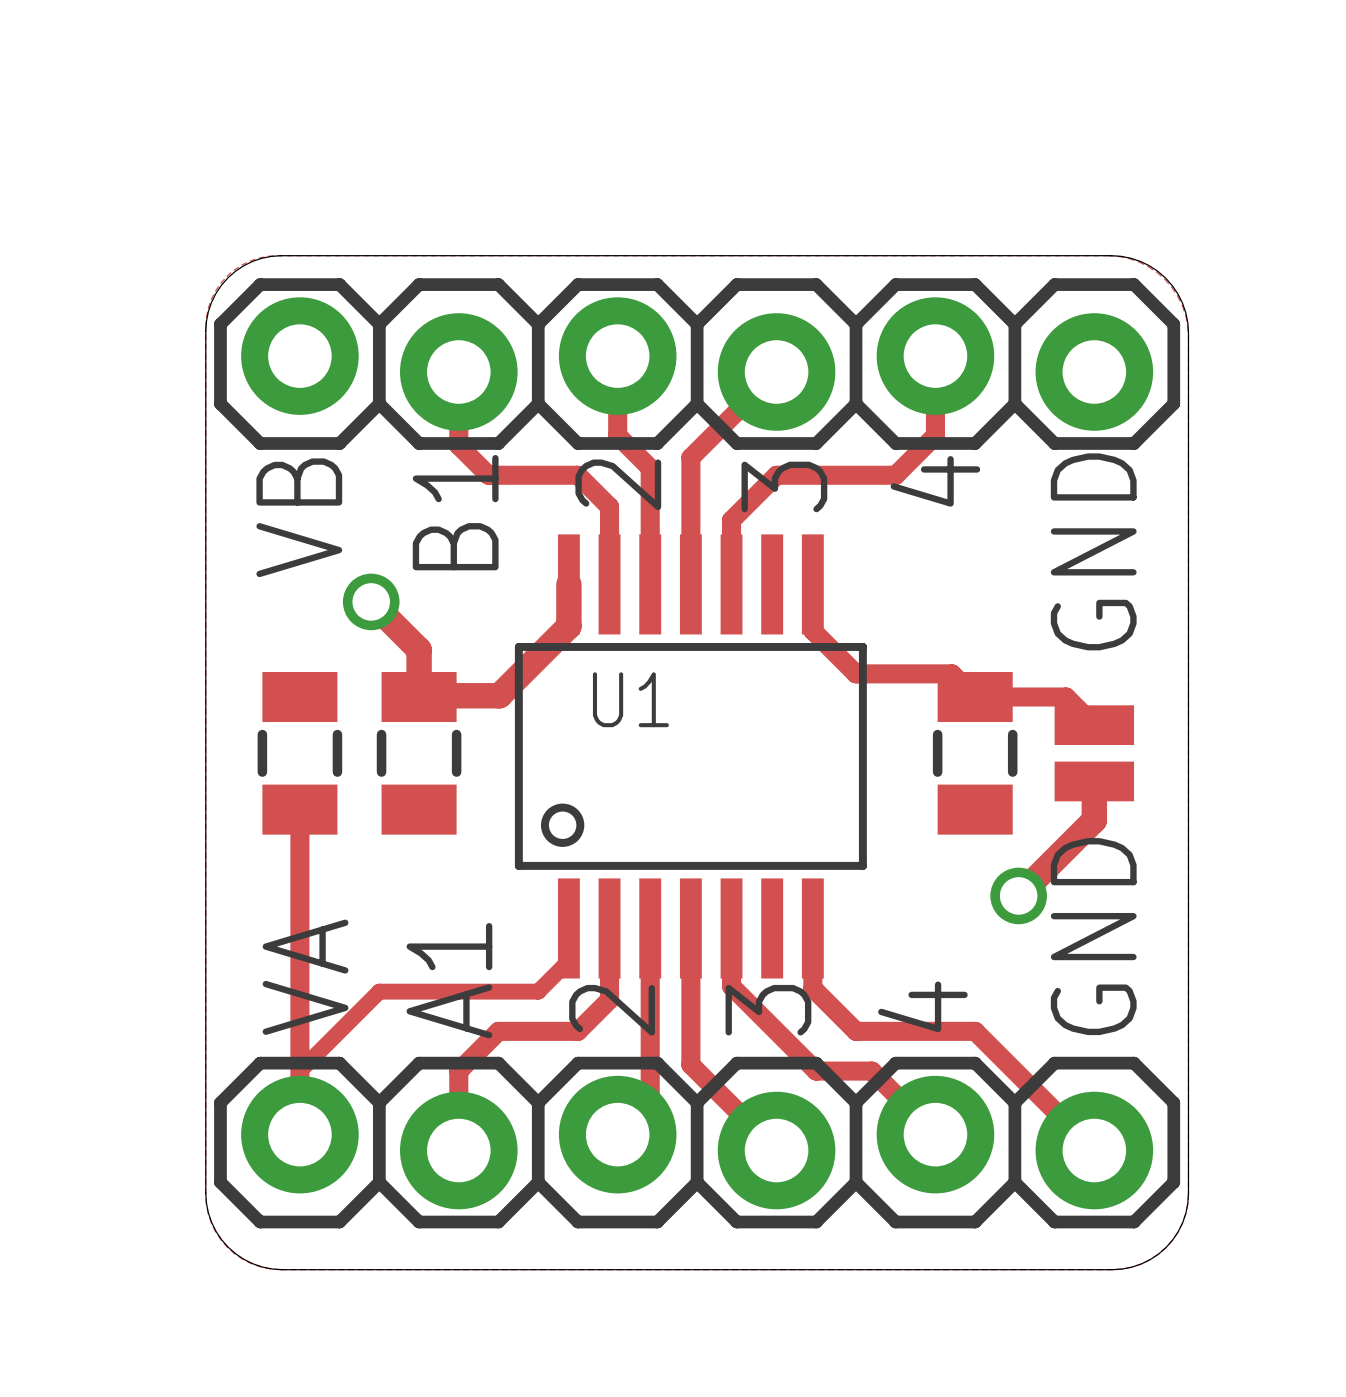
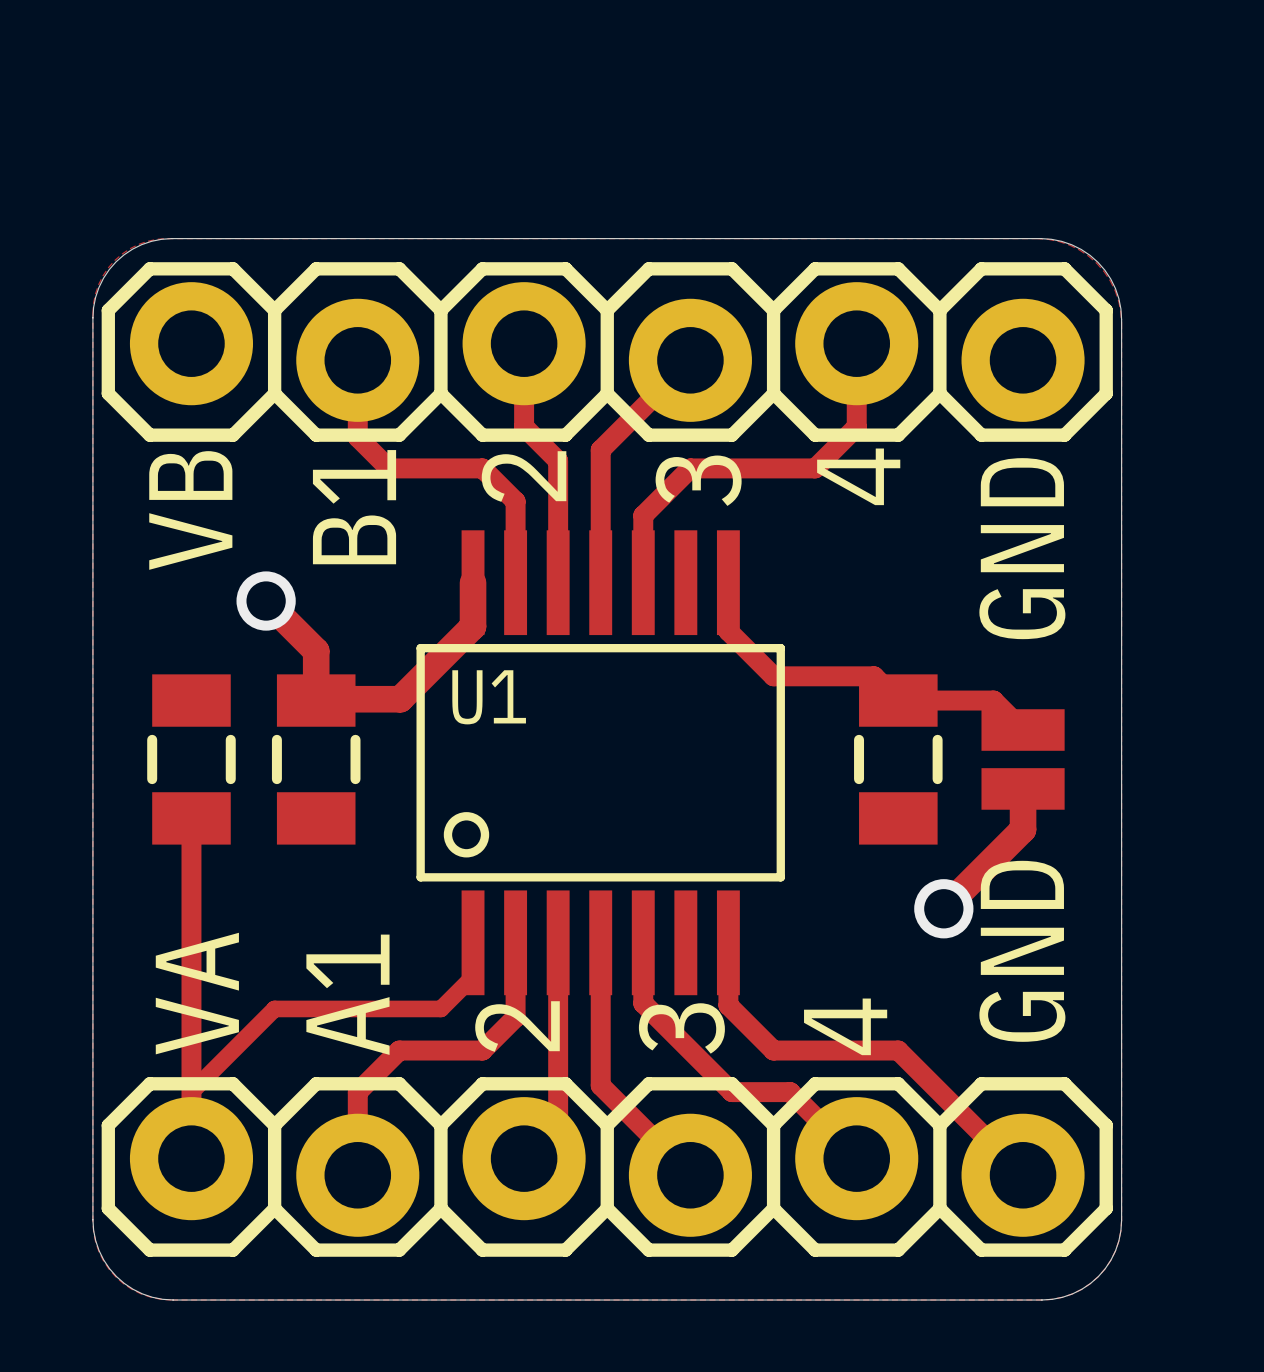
U1 name position: U1 (630, 699) -> U1 (489, 697)

